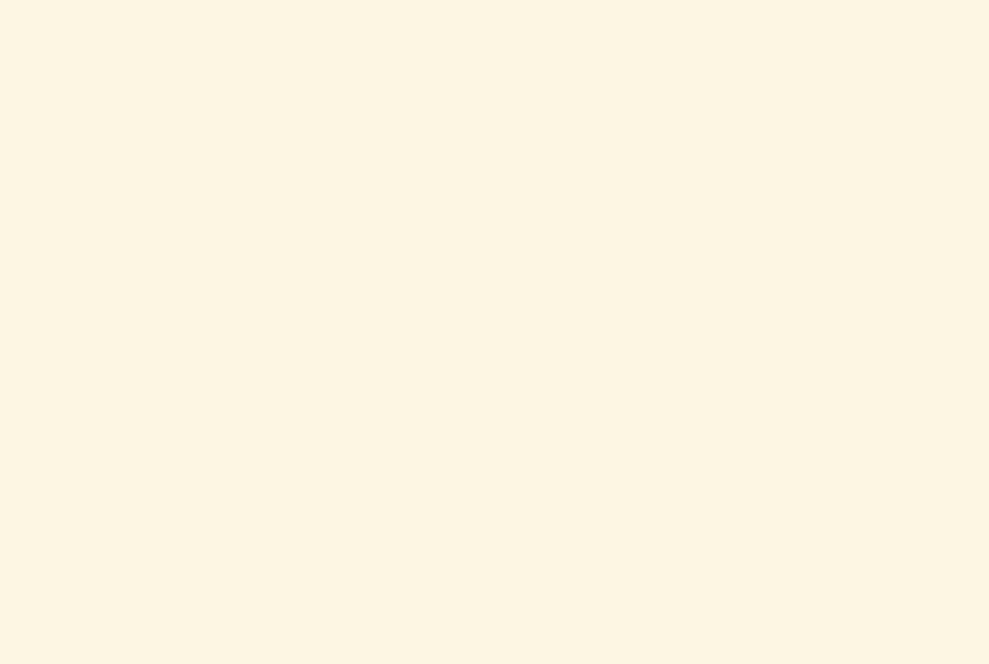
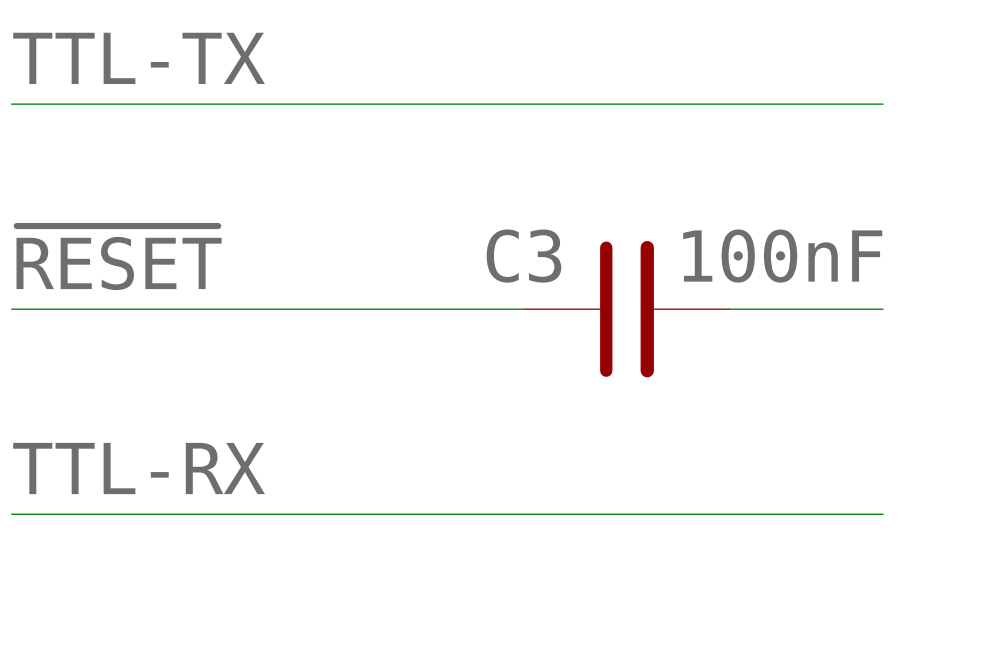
label: none -> TTL-TX (139, 58)
wire: none -> (11, 104) (883, 104)
label: none -> ~{RESET} (119, 258)
wire: none -> (11, 309) (524, 309)
C3: none -> 100nF (626, 309)
wire: none -> (729, 309) (883, 309)
label: none -> TTL-RX (139, 468)
wire: none -> (11, 514) (883, 514)

